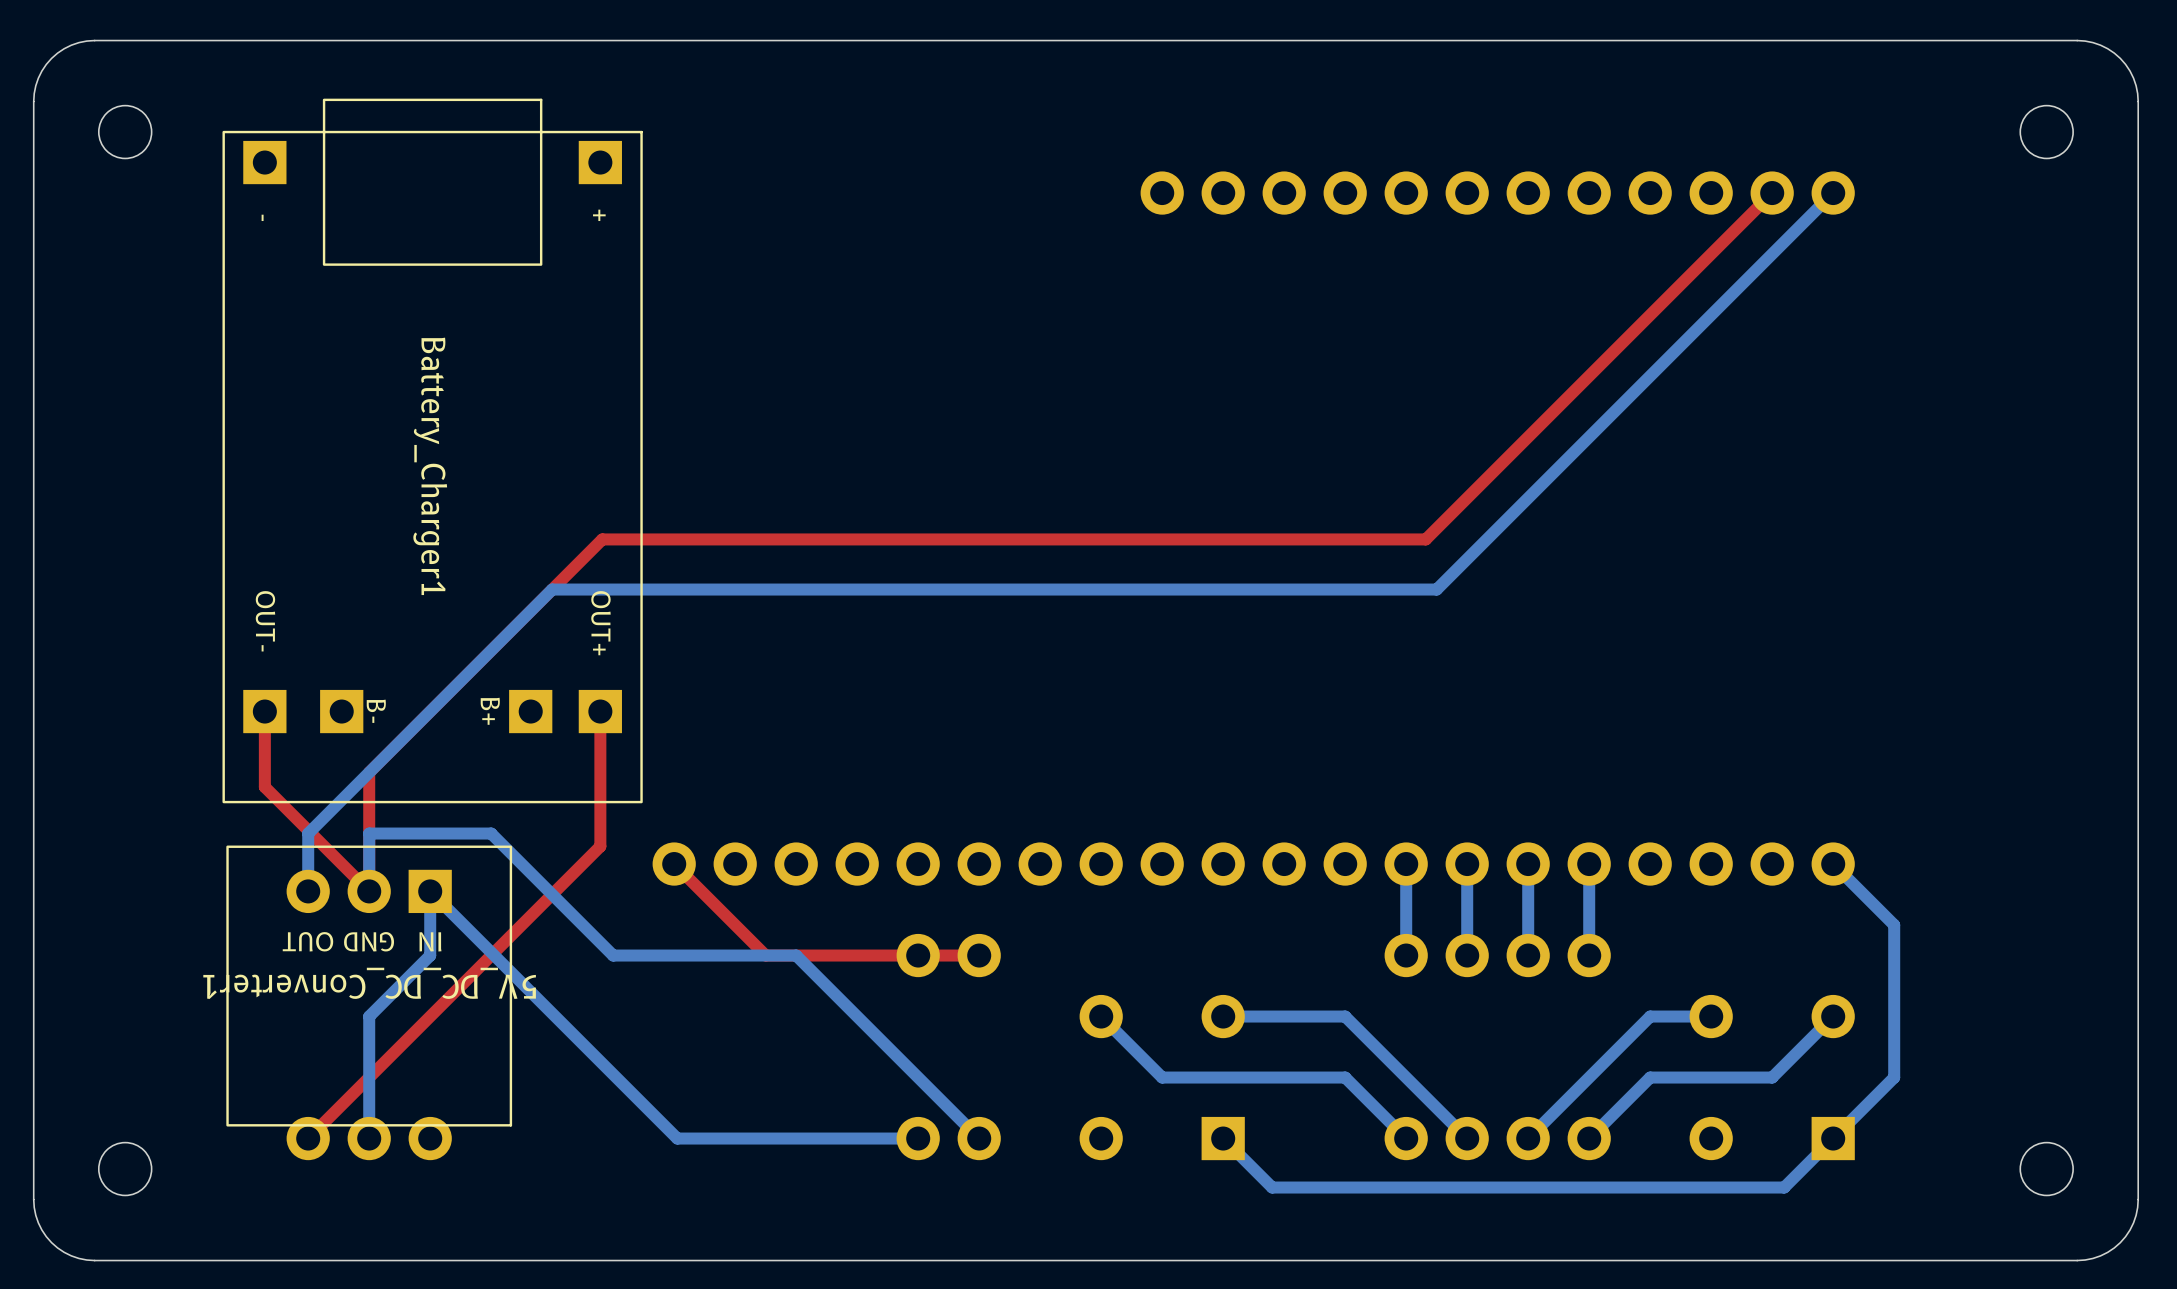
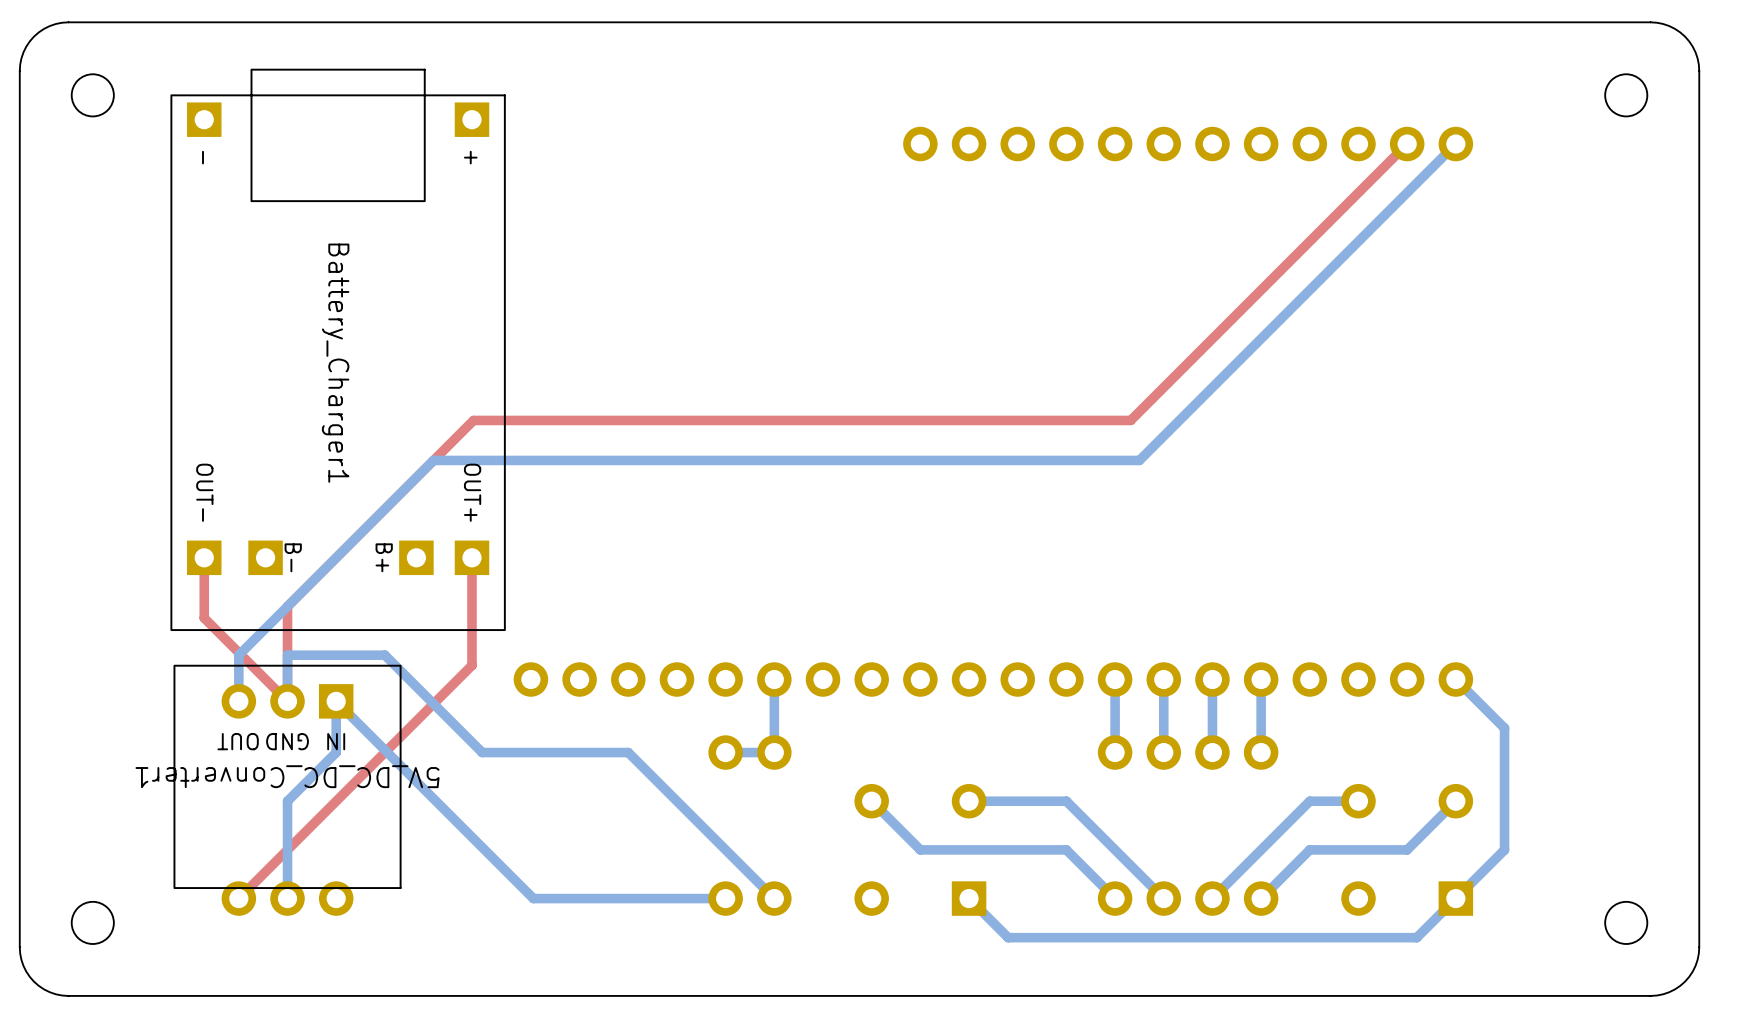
top track: (674, 864) (765, 955) (979, 955) -> none
bottom track: none -> (774, 679) (774, 752) (725, 752)

